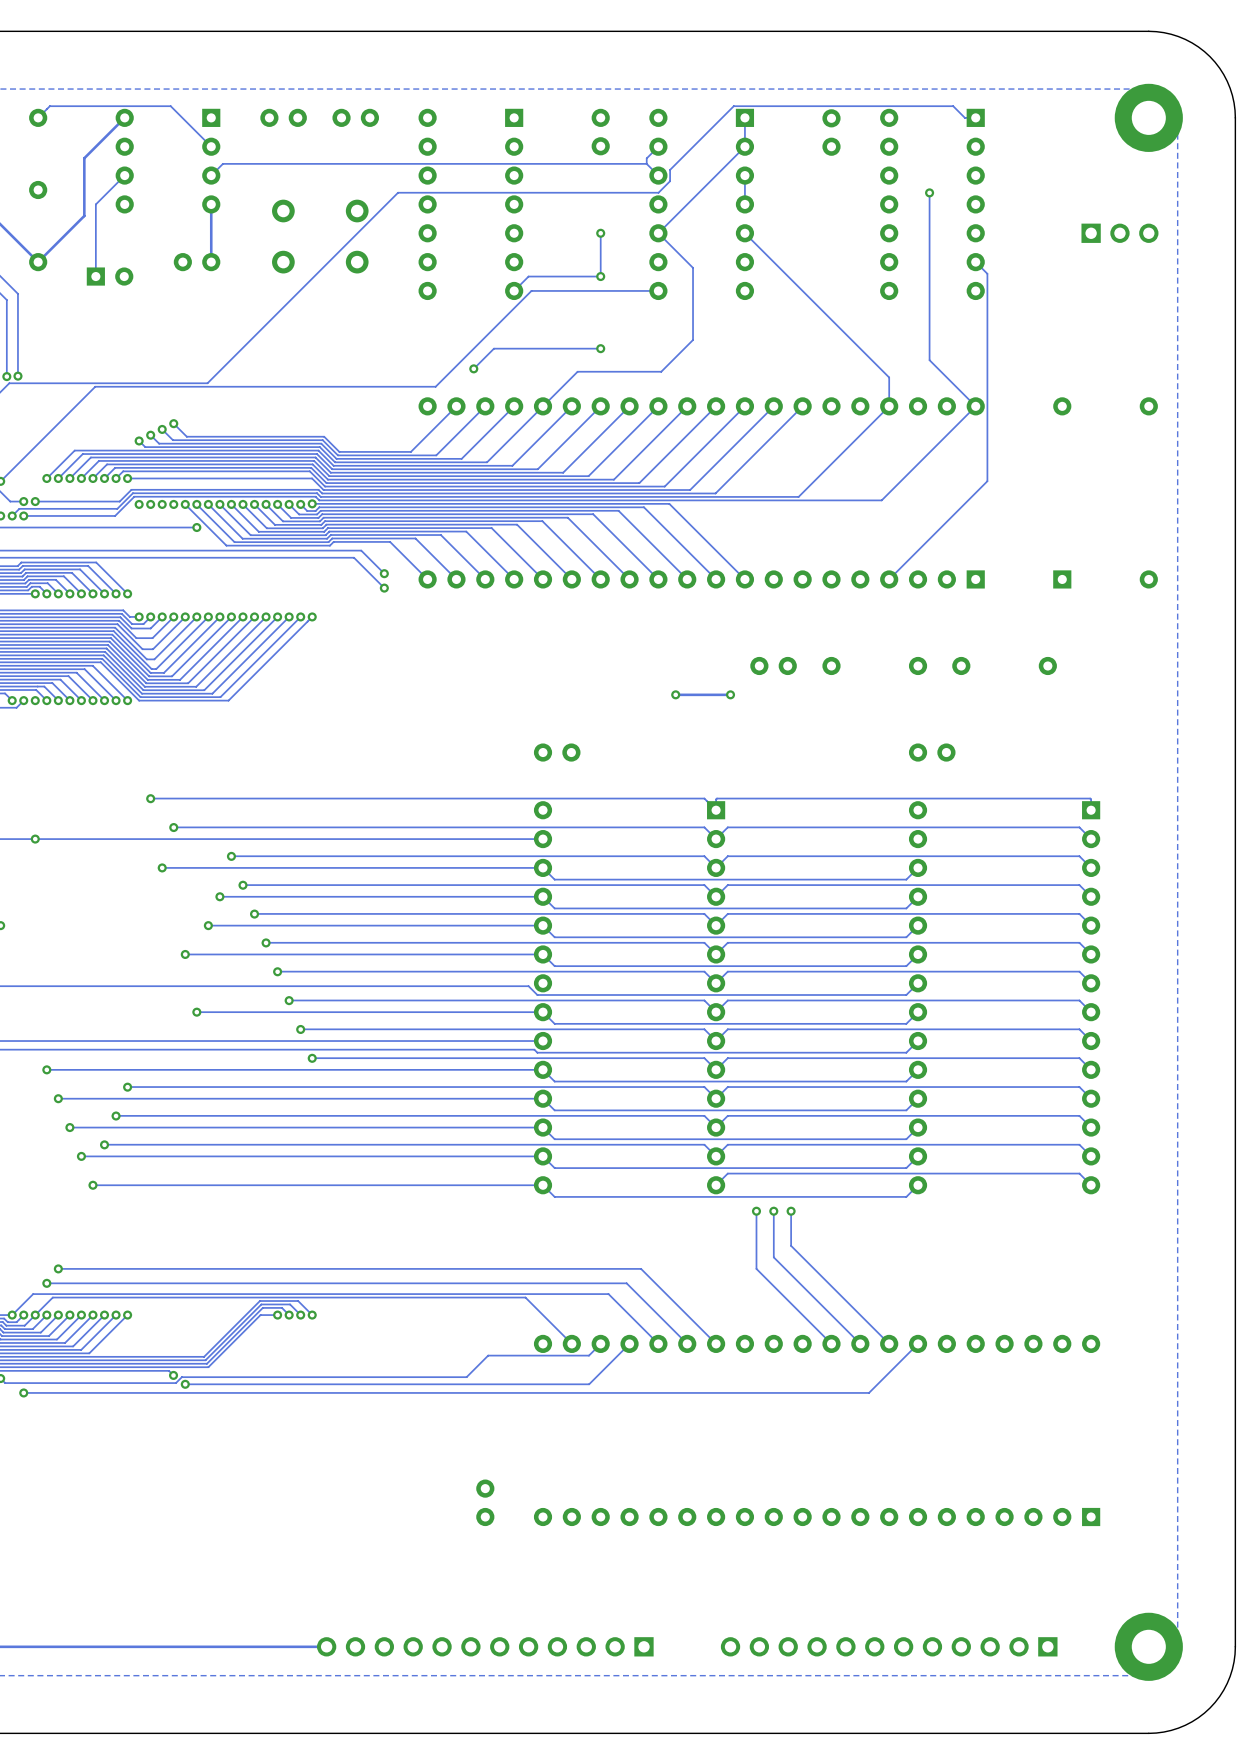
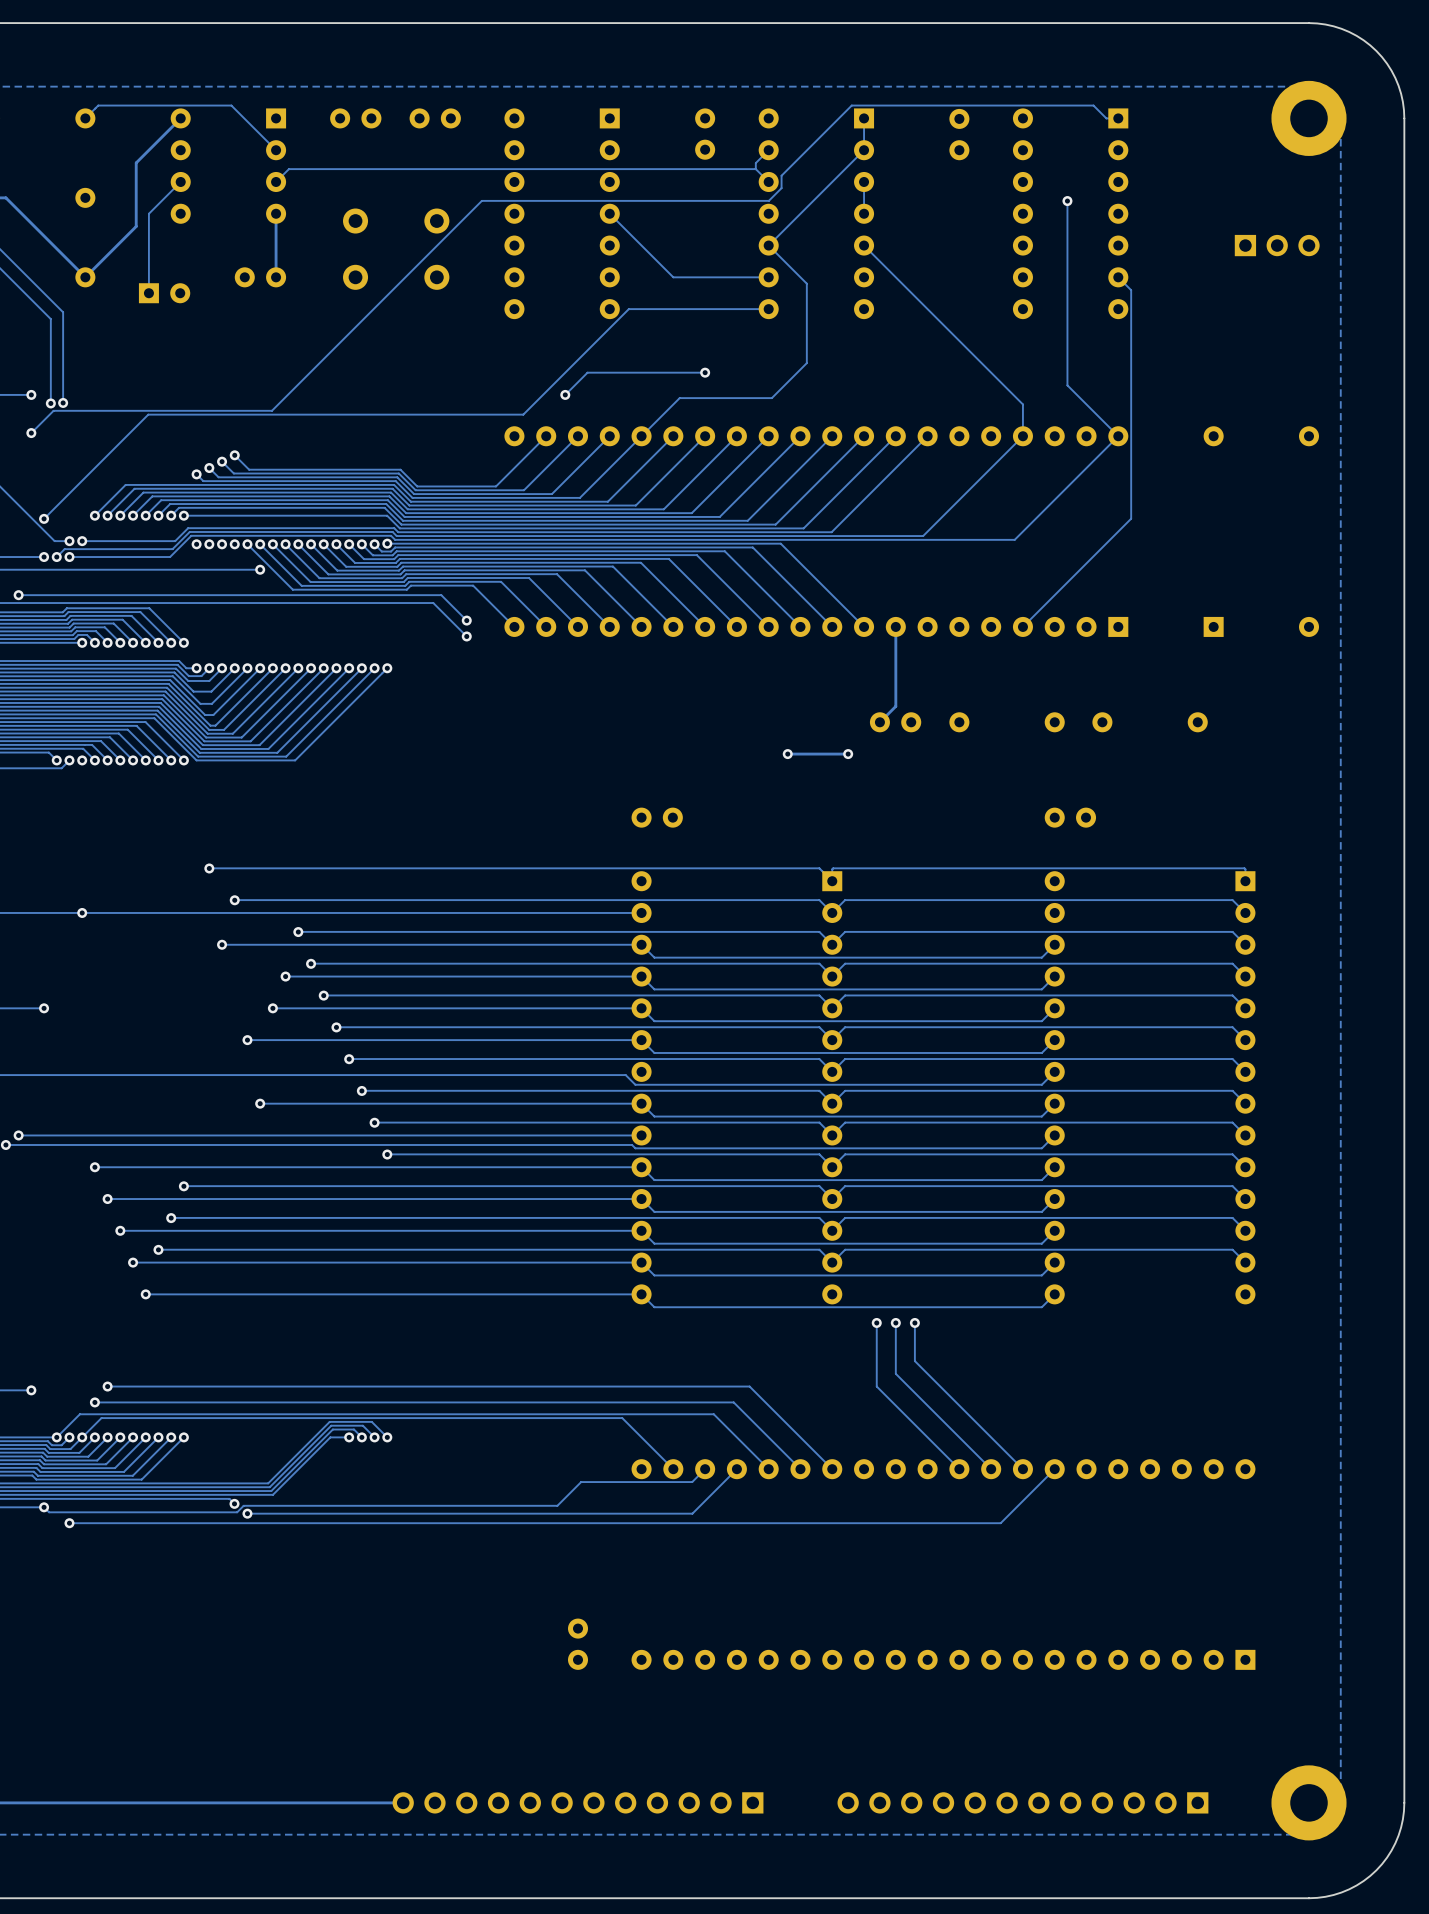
track: none -> (609, 213) (673, 277) (768, 277)
track: (600, 233) (600, 276) (528, 276) (514, 290) -> none
via: (600, 233) -> none
via: (600, 276) -> none
track: none -> (895, 626) (895, 706) (879, 722)
track: (1091, 1185) (1079, 1173) (727, 1173) (716, 1185) -> none

